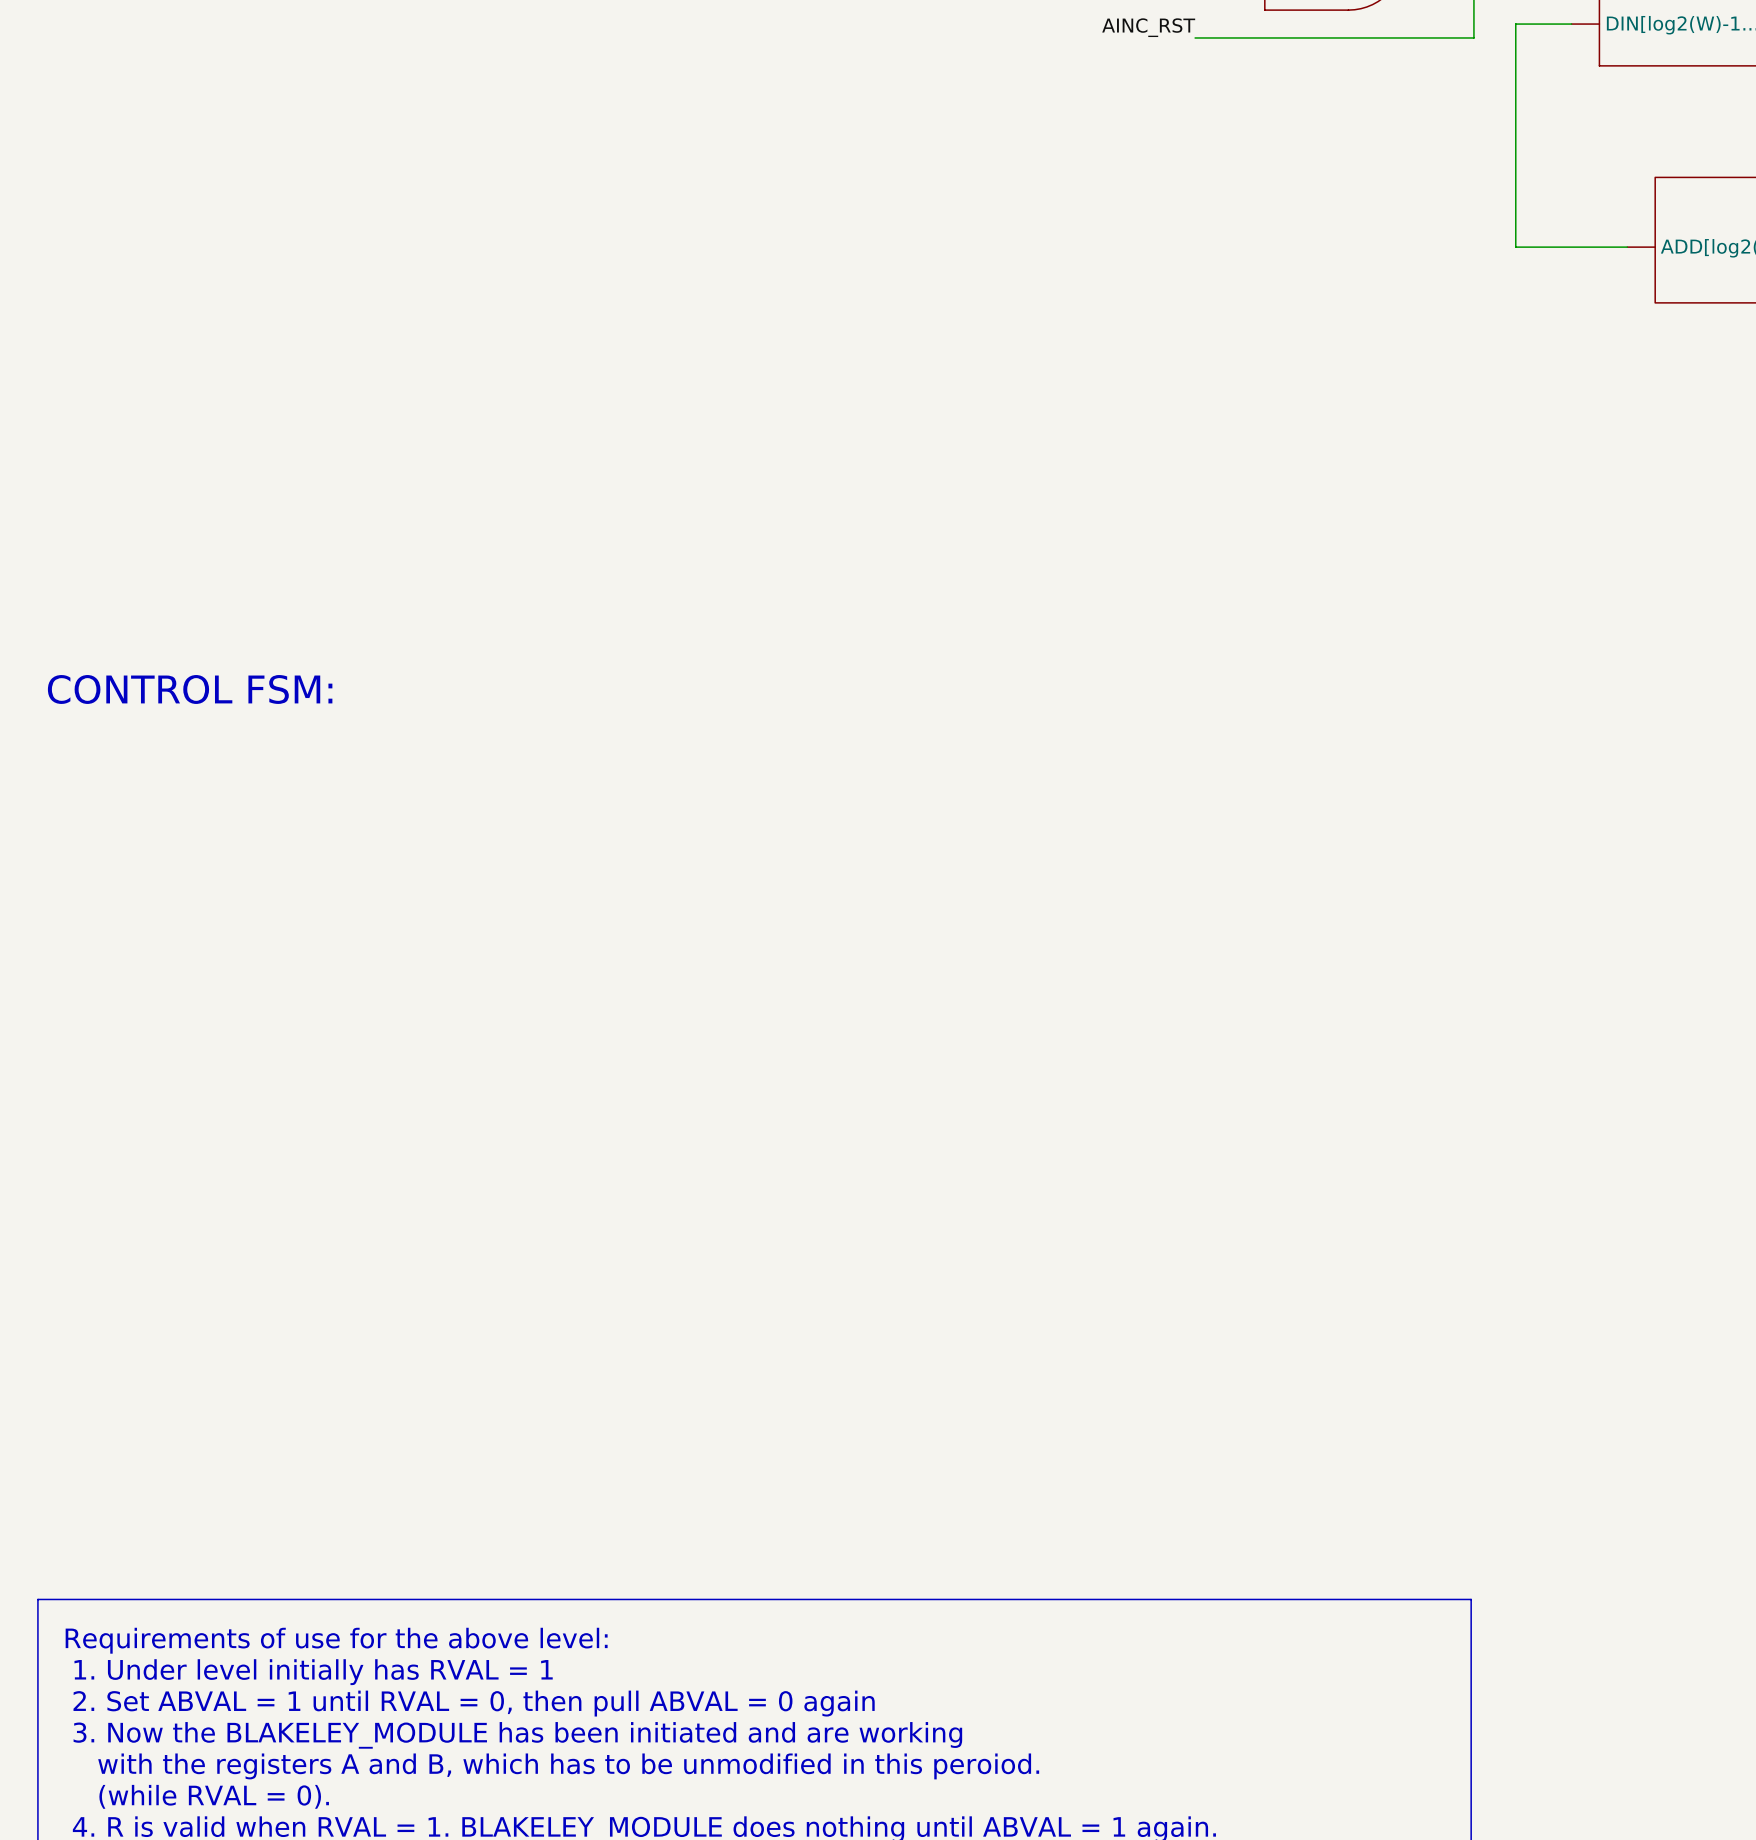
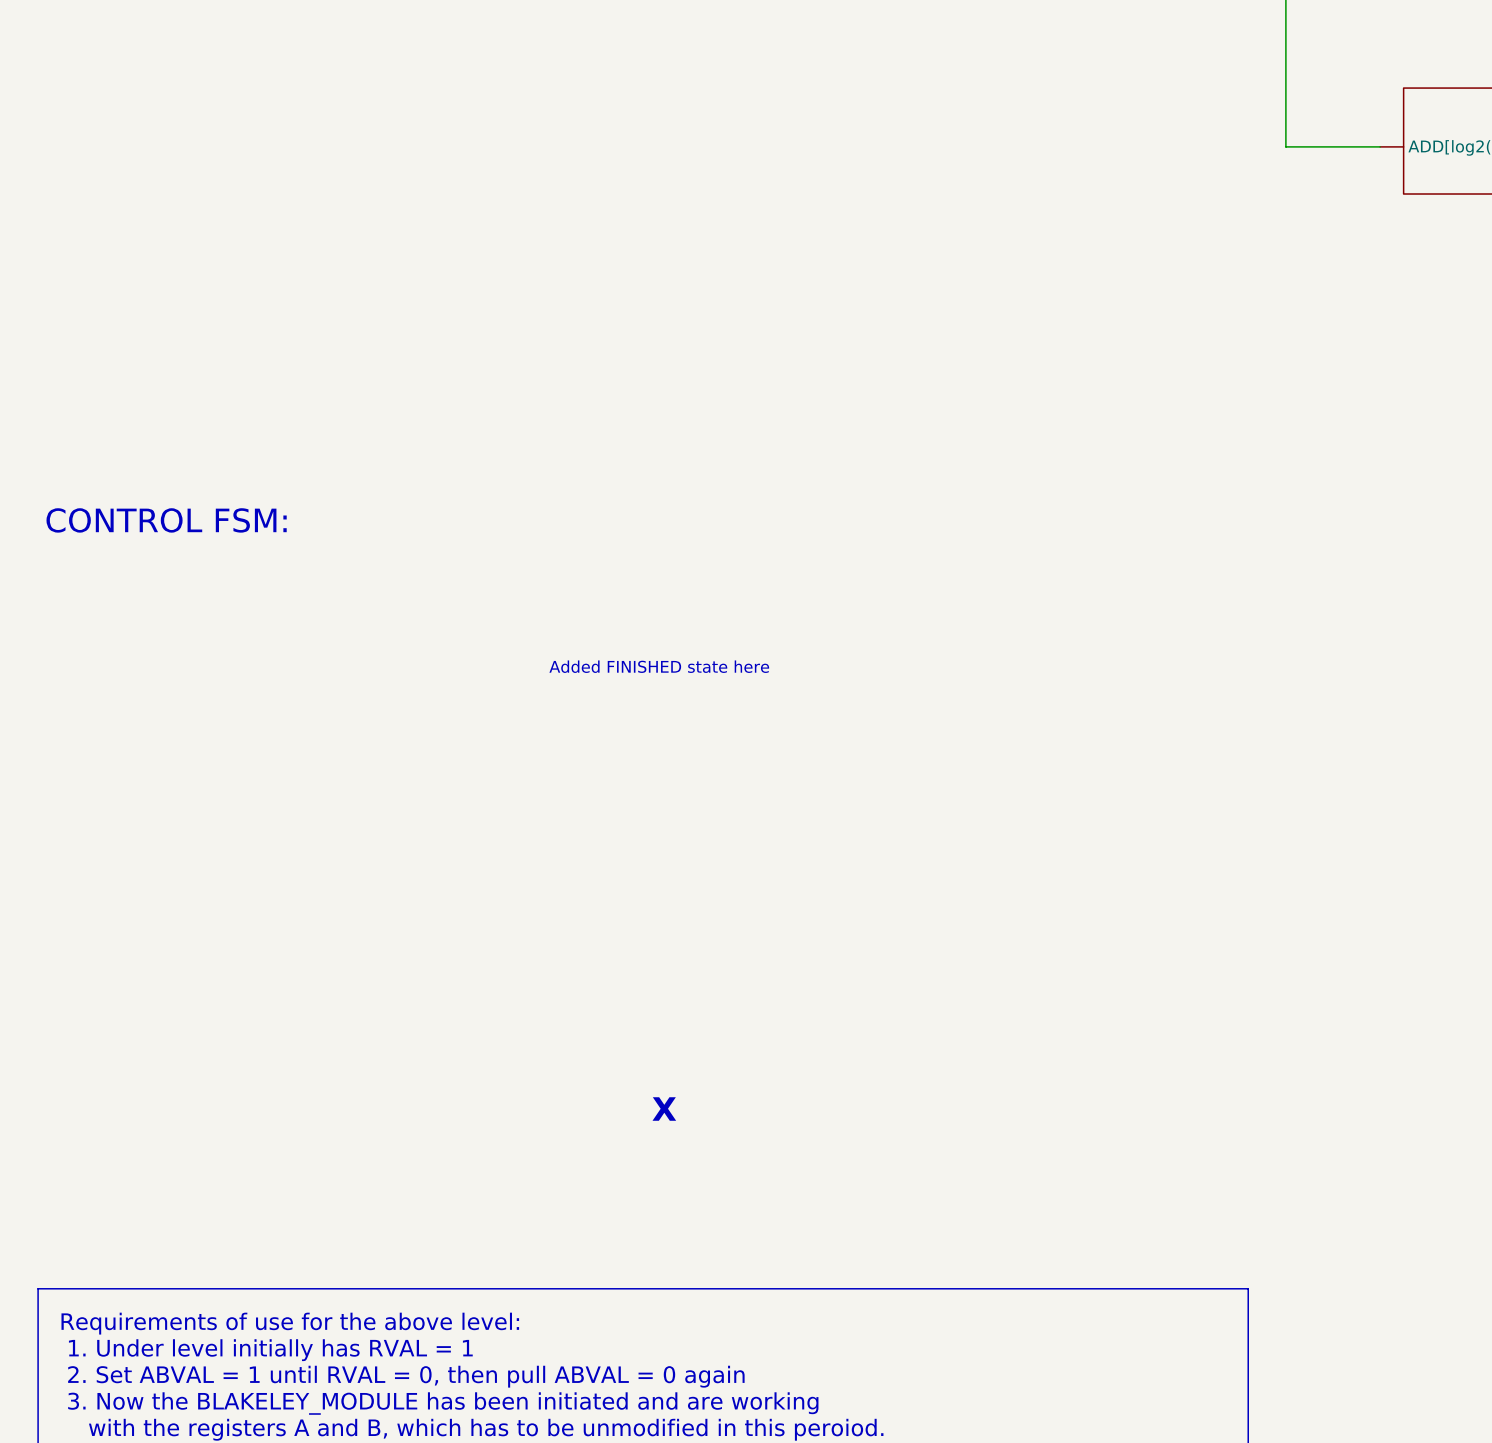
text: none -> Added FINISHED state here (659, 666)
text: none -> X (664, 1109)

